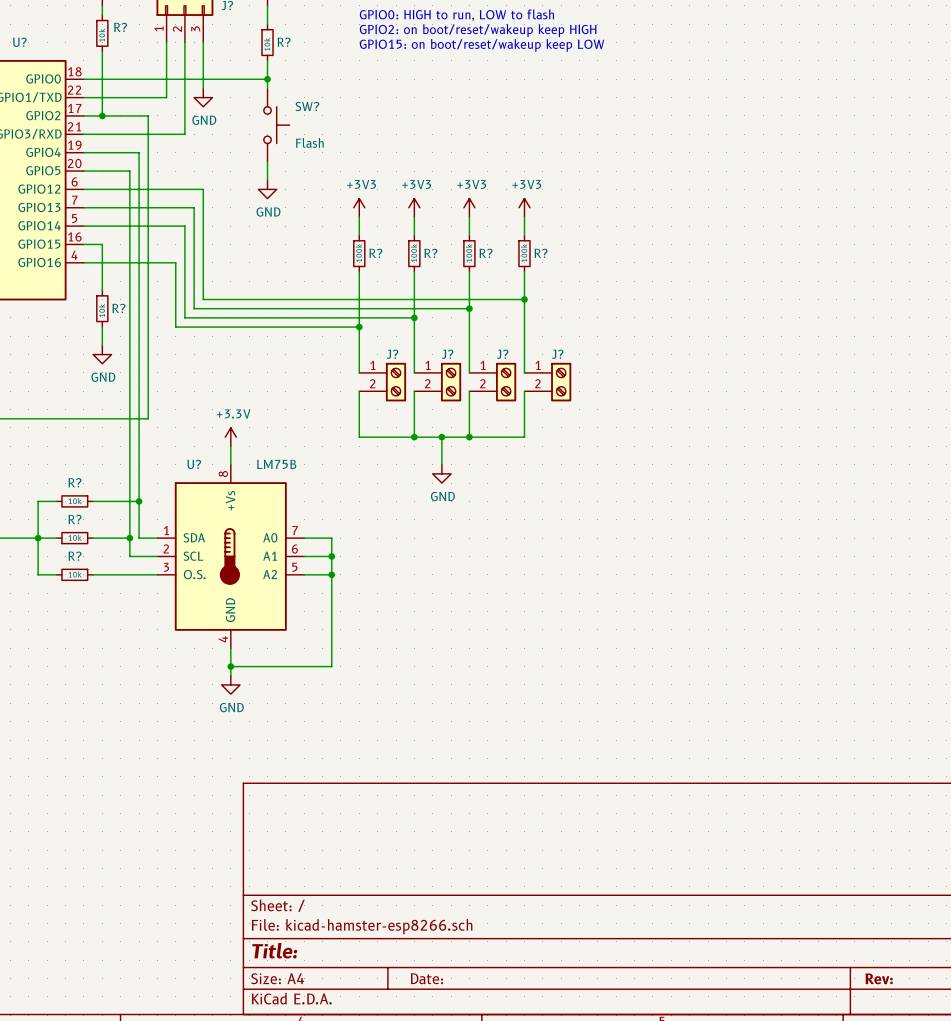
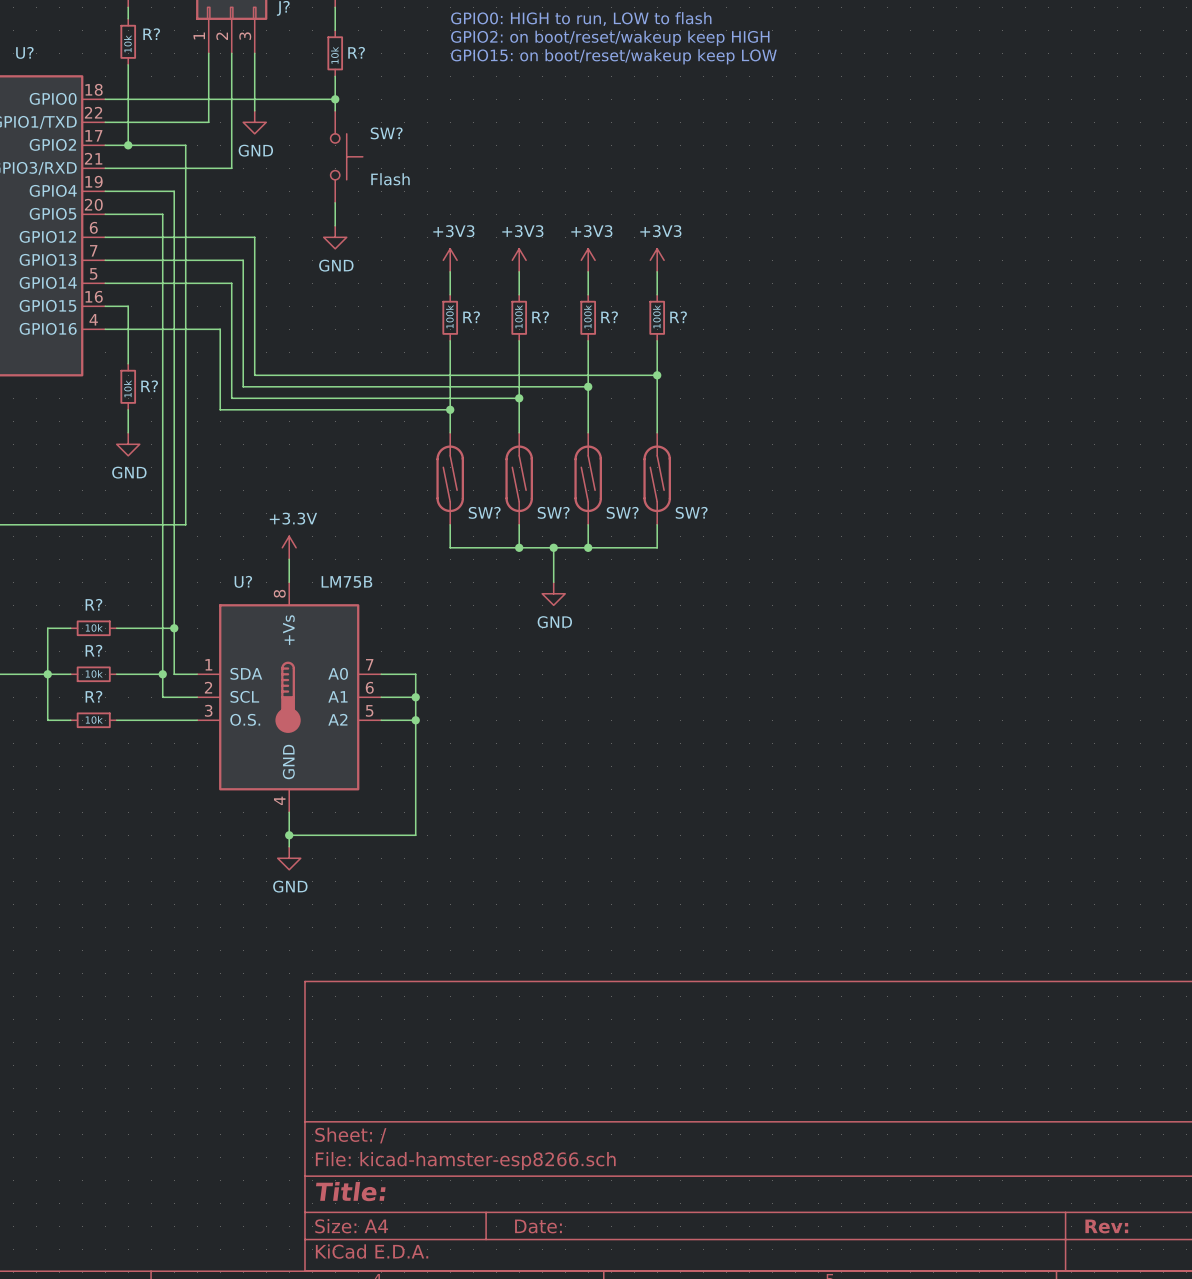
SW?: none -> (450, 478)
J?: (382, 382) -> none
SW?: none -> (519, 478)
J?: (437, 382) -> none
SW?: none -> (588, 478)
J?: (492, 382) -> none
SW?: none -> (657, 478)
J?: (547, 382) -> none

